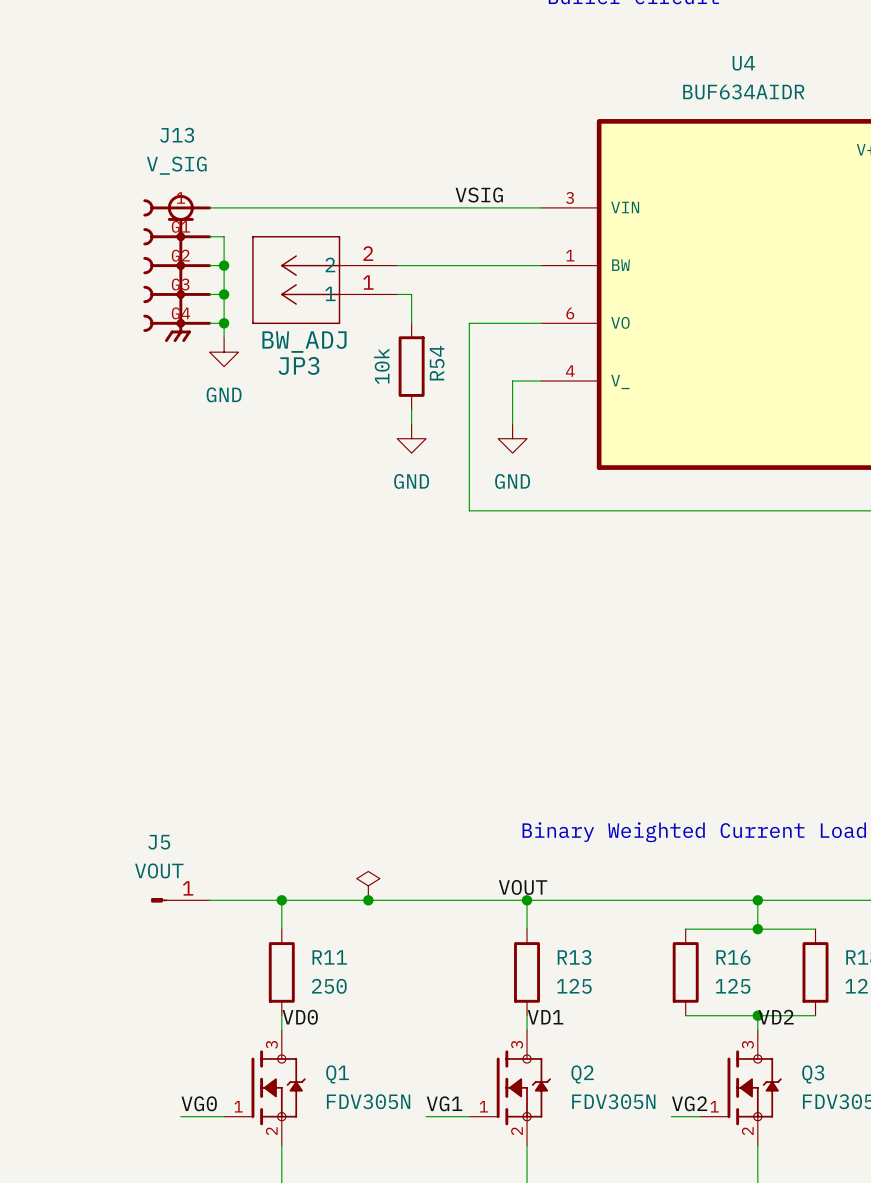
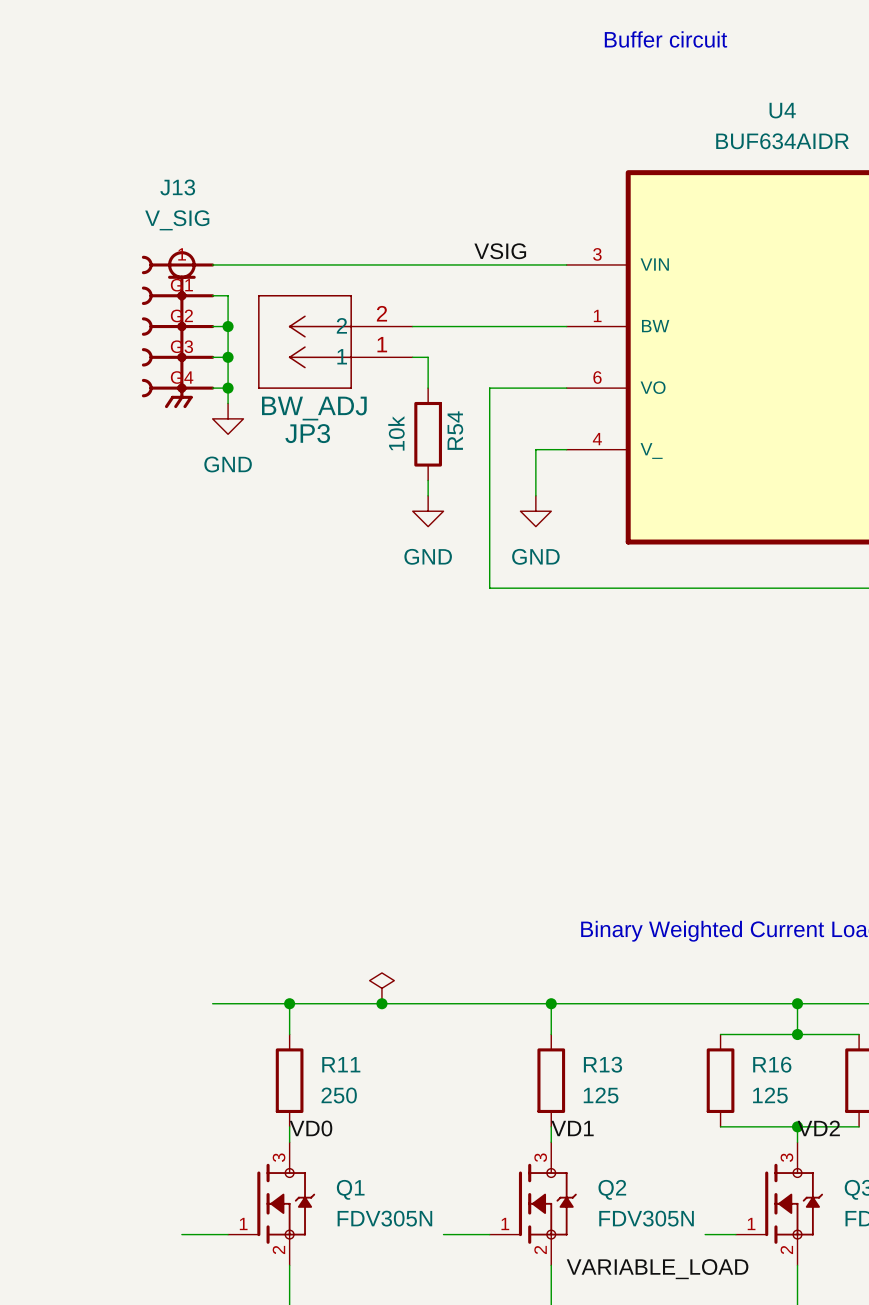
label: VOUT (523, 887) -> none
J5: VOUT (180, 900) -> none
label: VG0 (199, 1103) -> none
label: VG1 (444, 1103) -> none
label: VG2 (689, 1103) -> none
label: none -> VARIABLE_LOAD (657, 1269)

